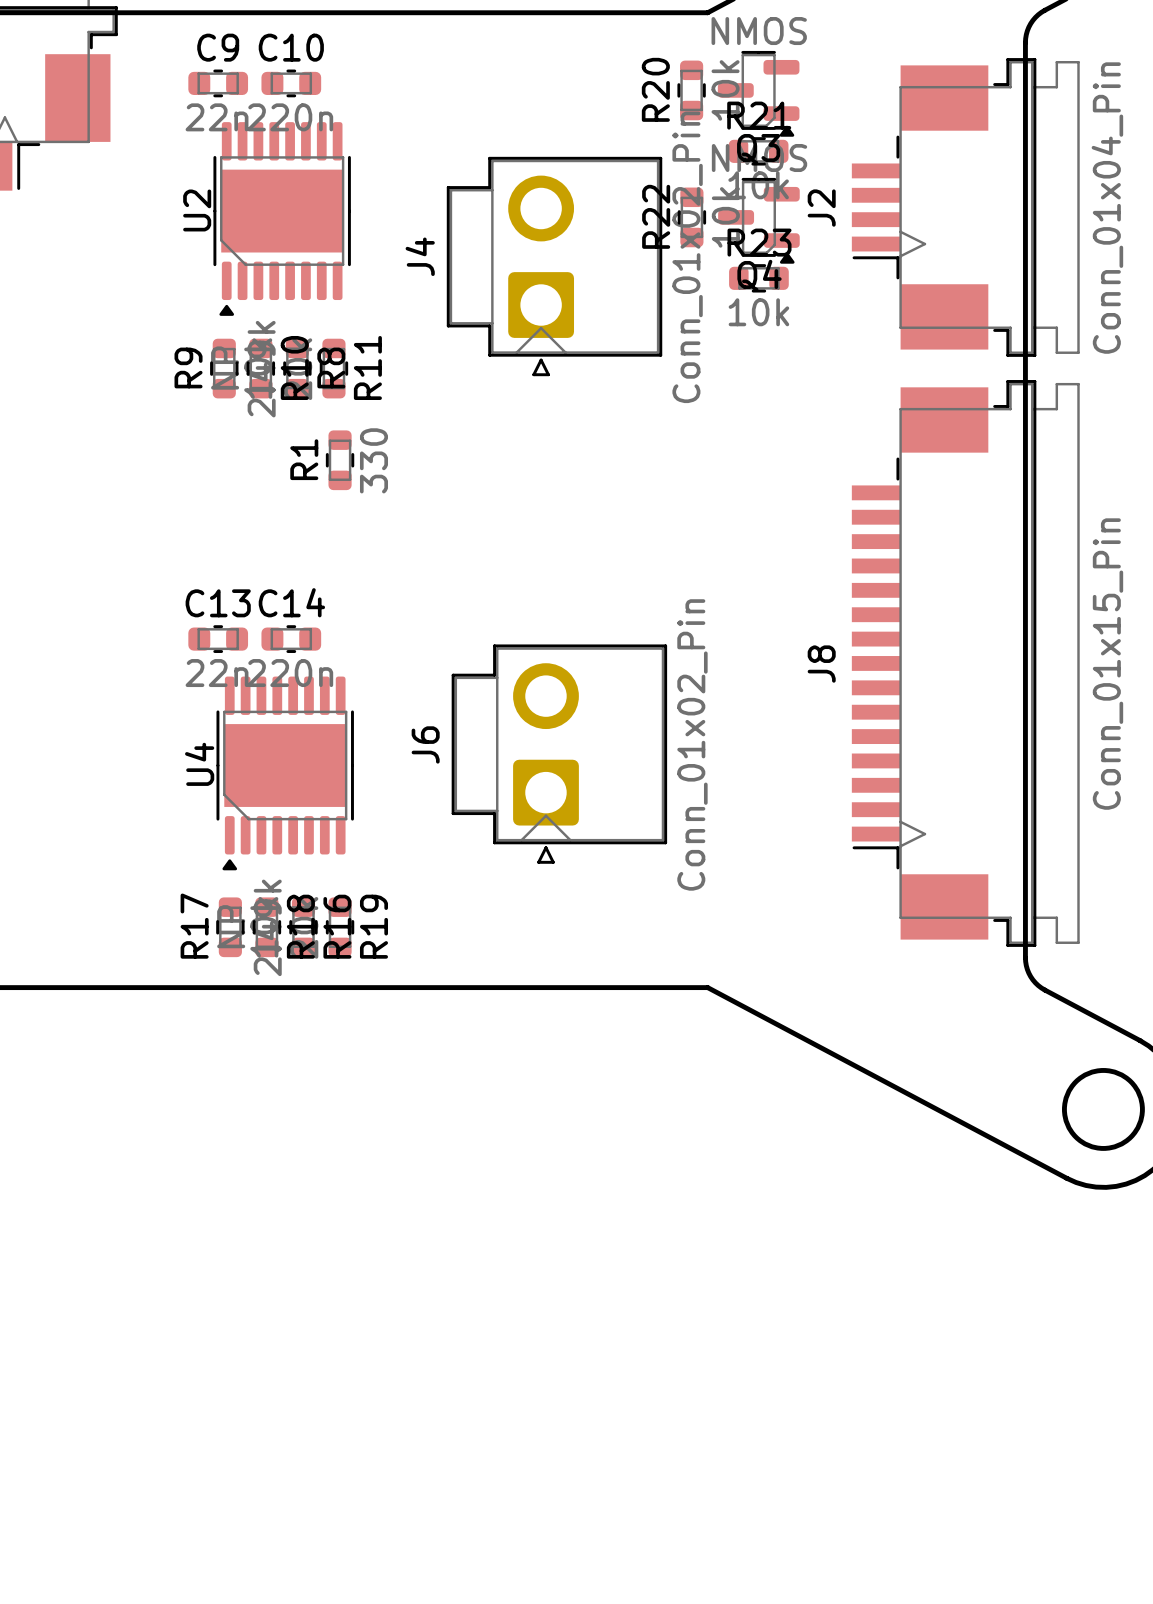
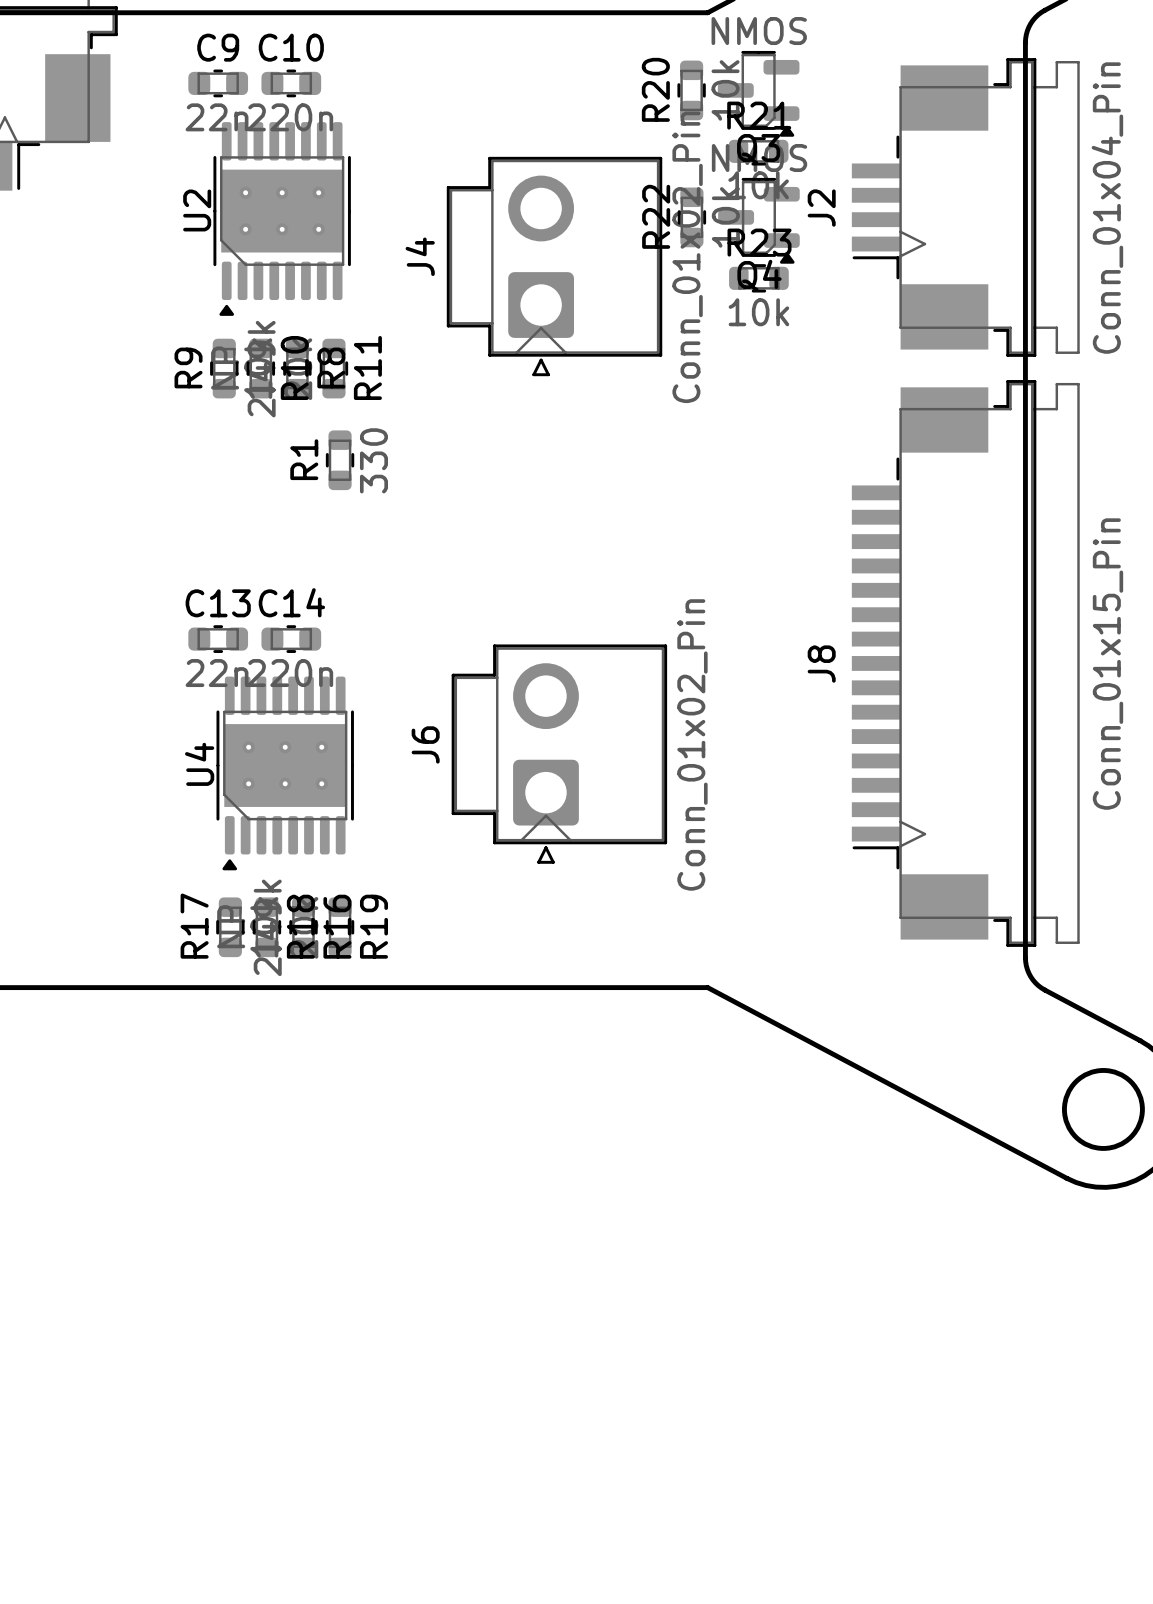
U2 footprint: [213, 122, 351, 316] -> [213, 122, 351, 316]
U4 footprint: [216, 676, 354, 871] -> [216, 676, 354, 871]

